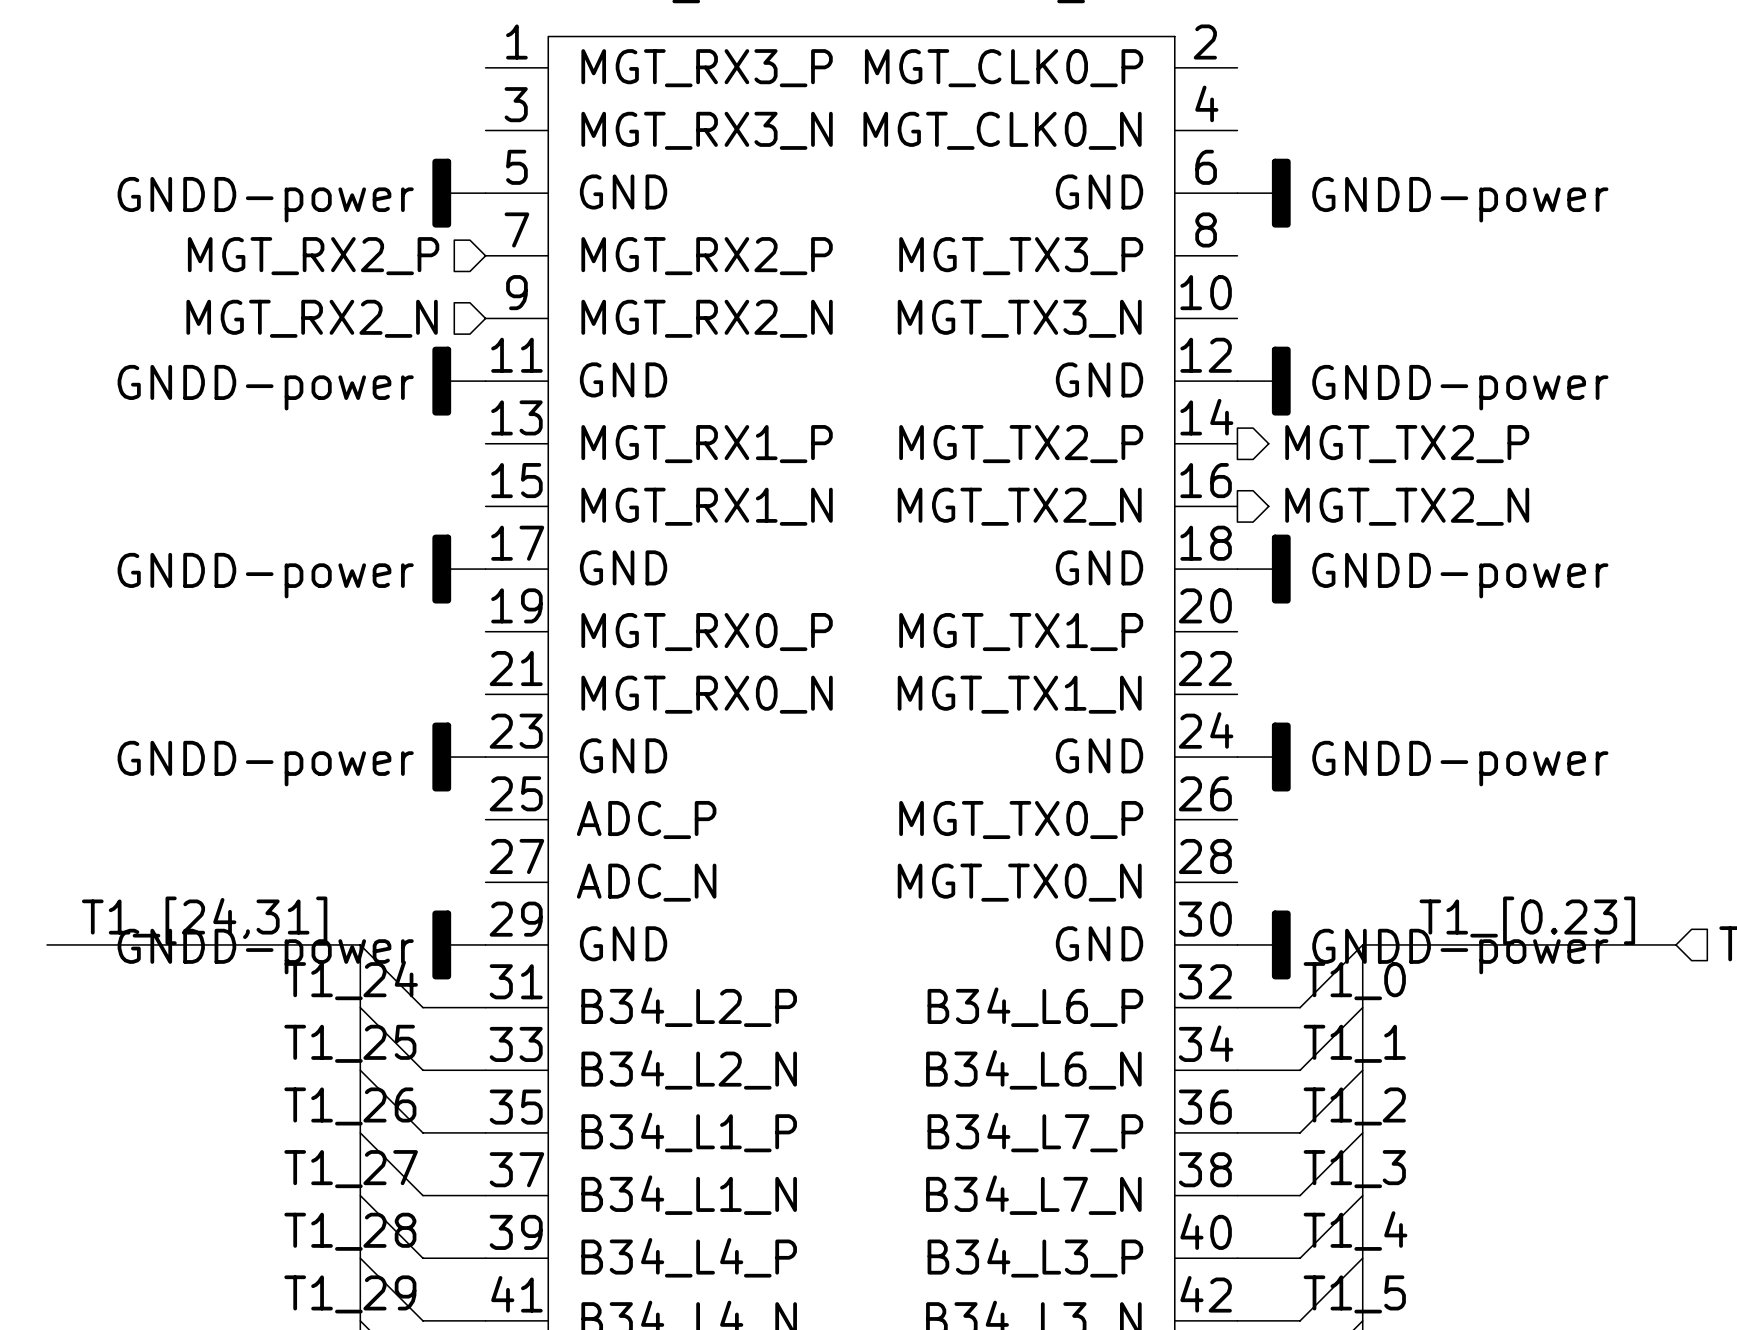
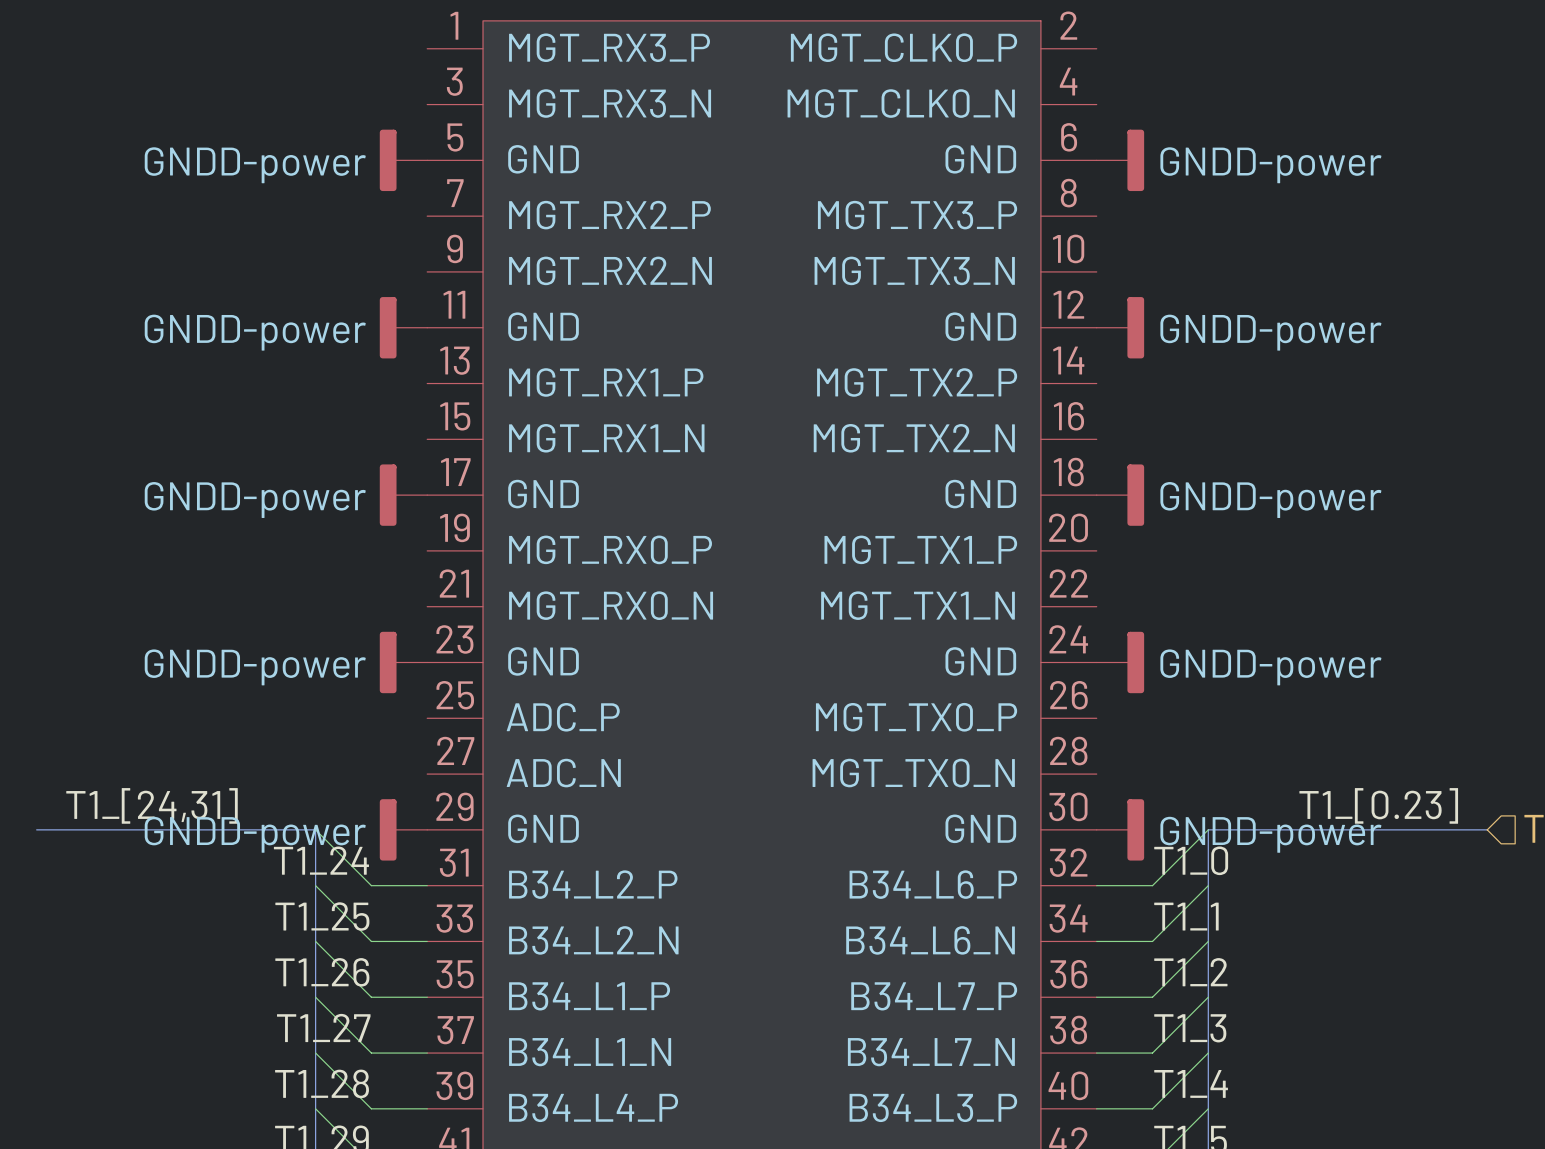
hierarchical label: MGT_RX2_P (313, 256) -> none
hierarchical label: MGT_RX2_N (312, 318) -> none
hierarchical label: MGT_TX2_P (1407, 444) -> none
hierarchical label: MGT_TX2_N (1407, 506) -> none

